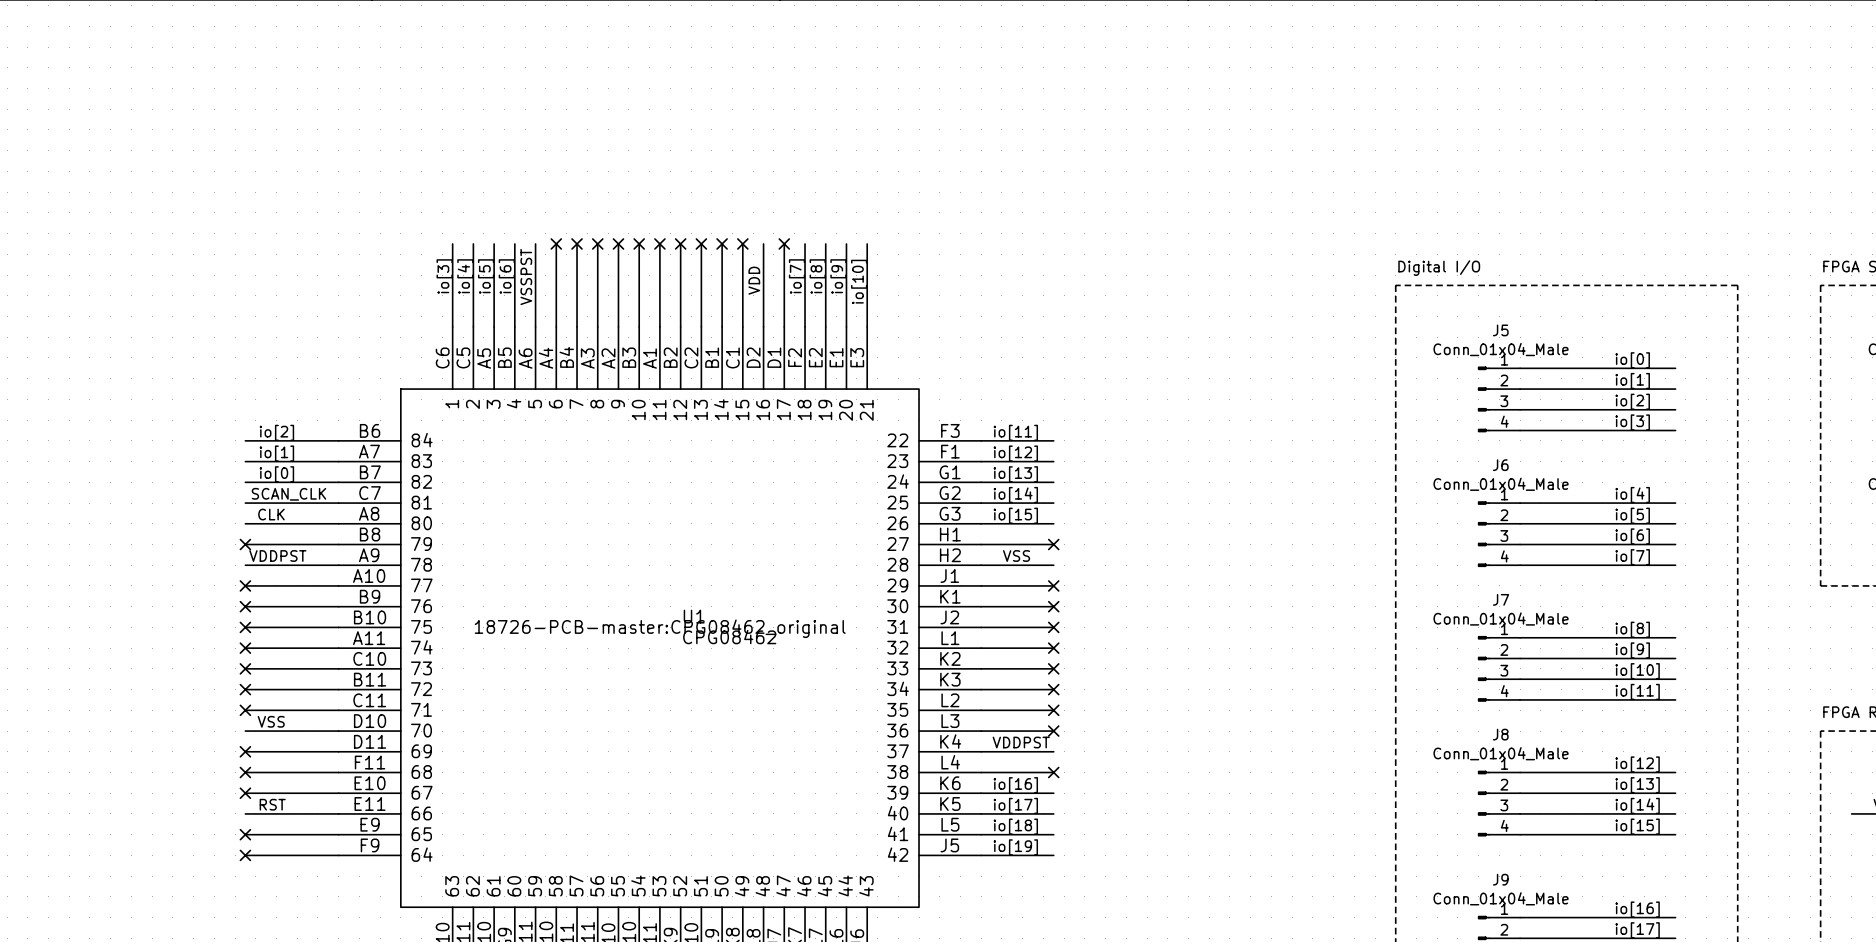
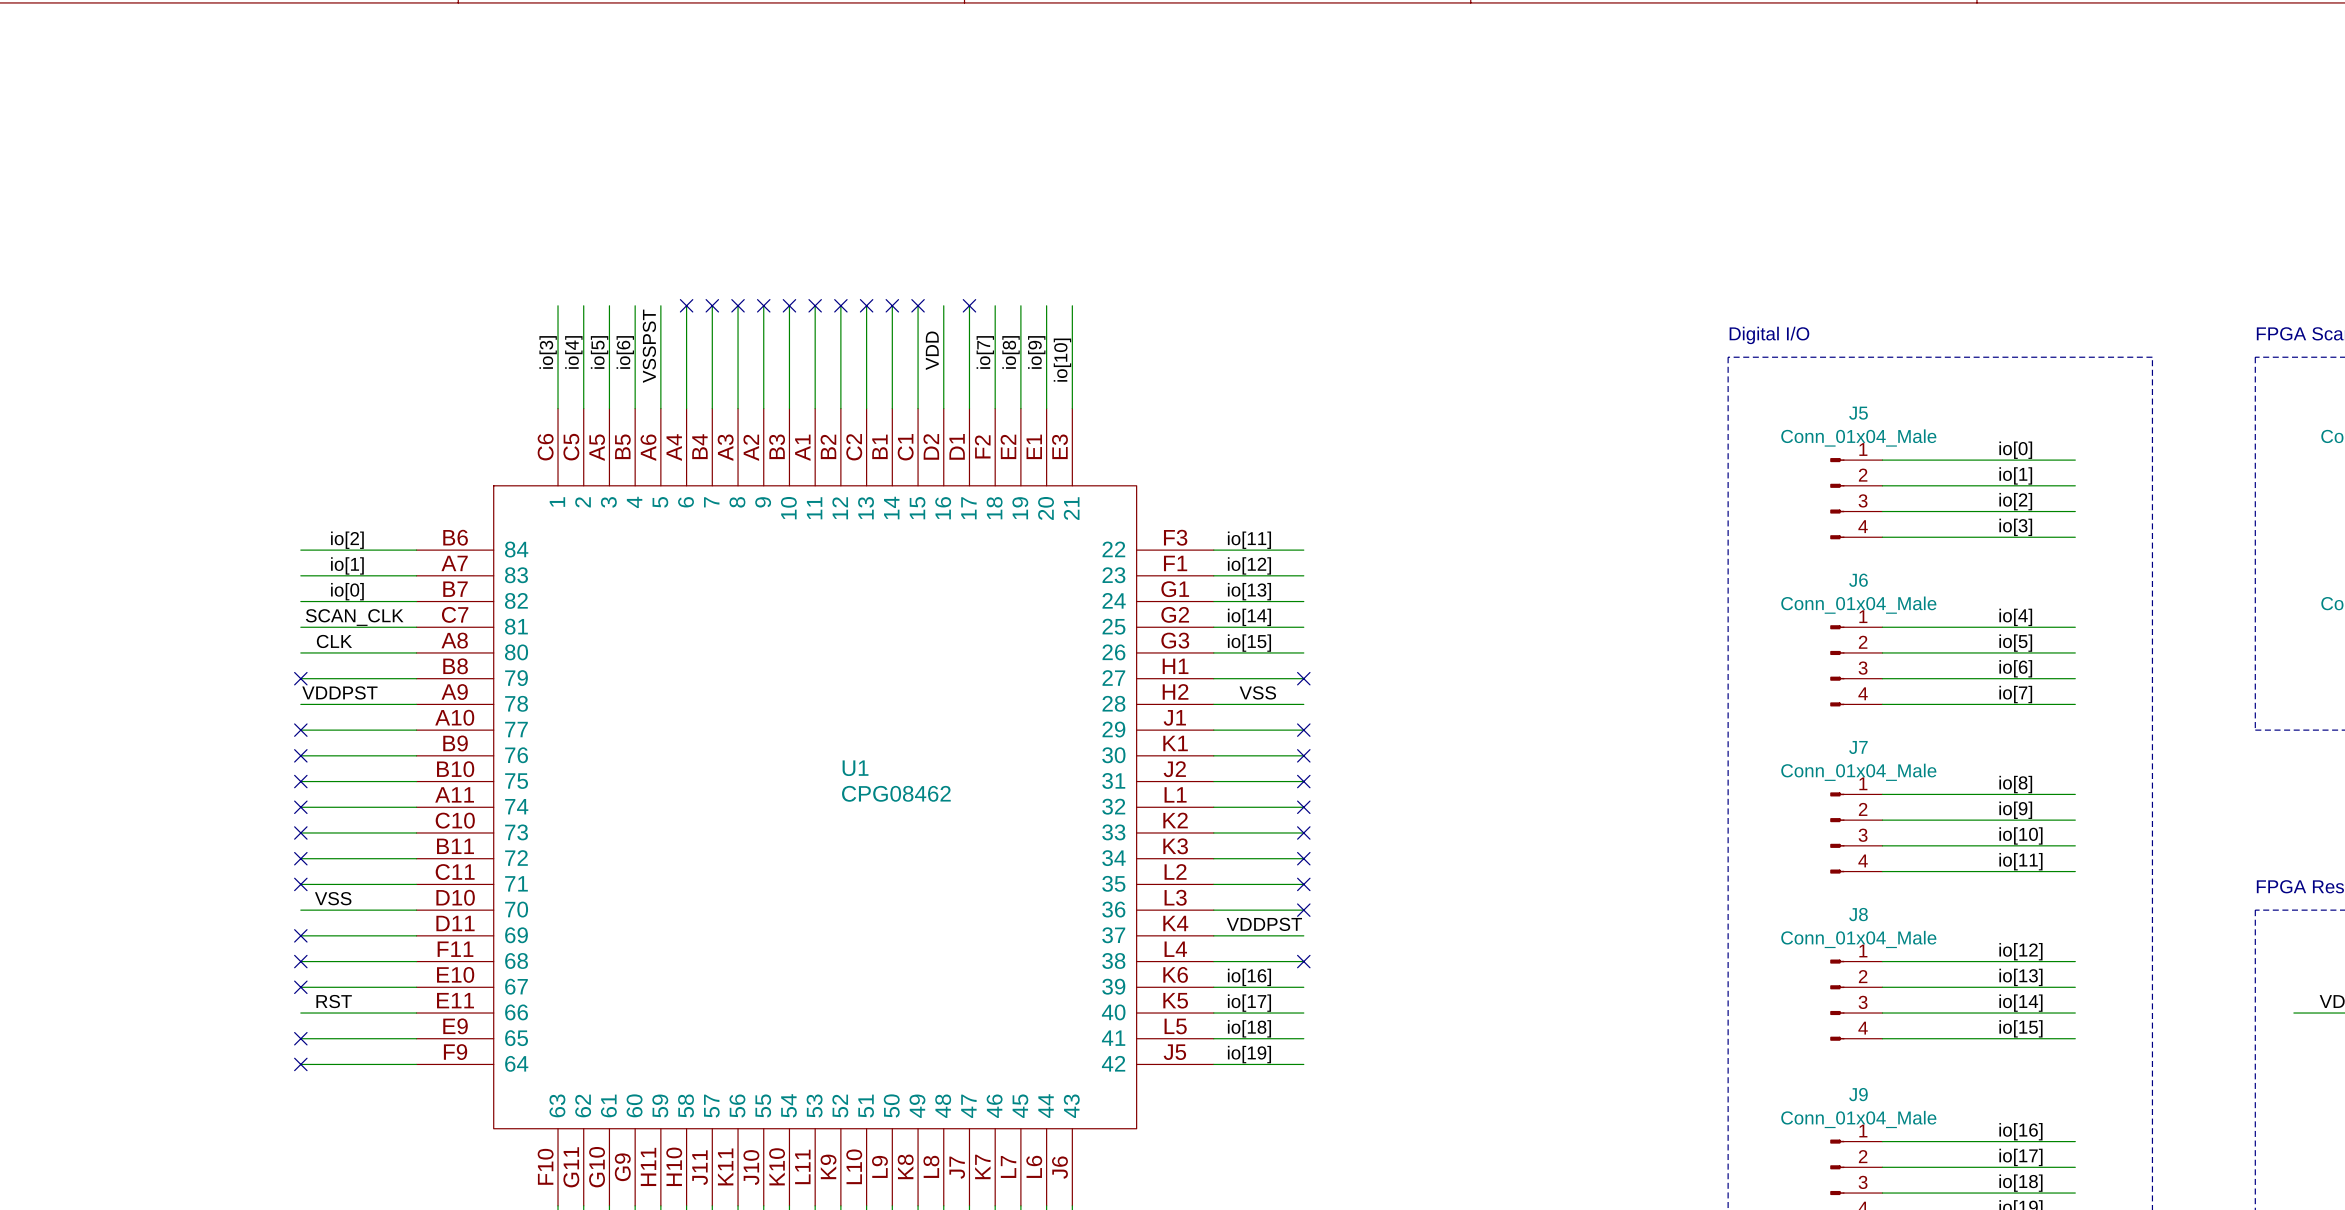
U1 text: 18726-PCB-master:CPG08462_original (660, 628) -> none

